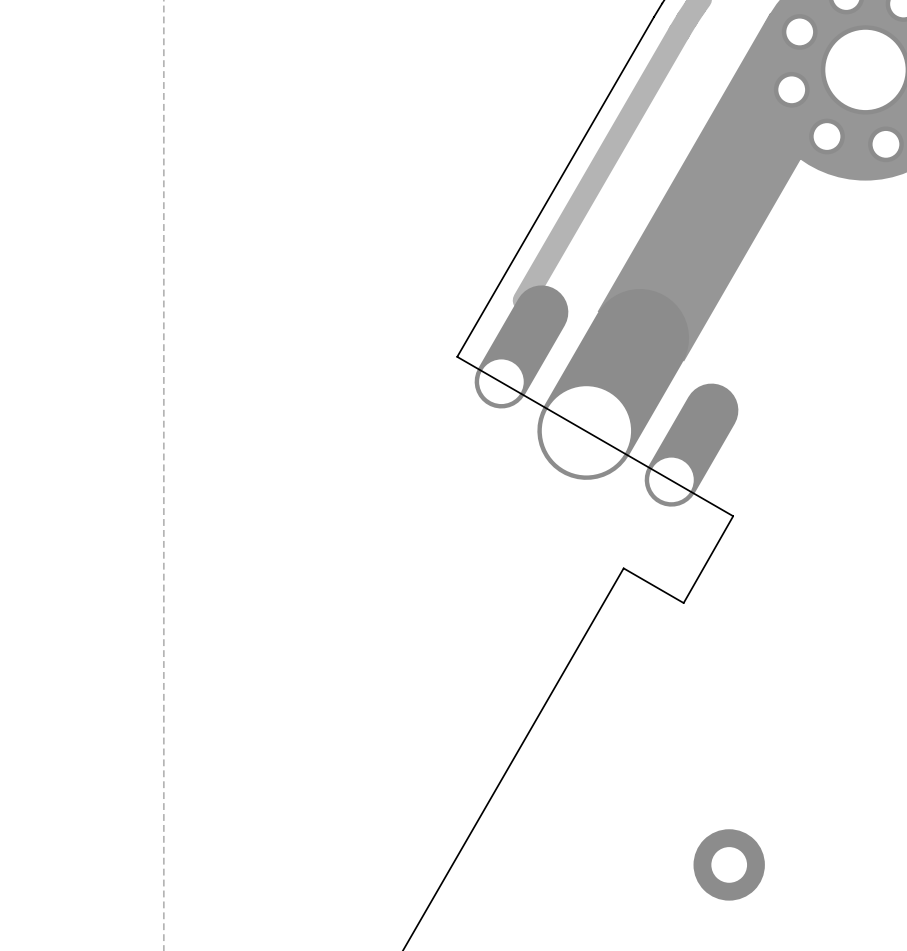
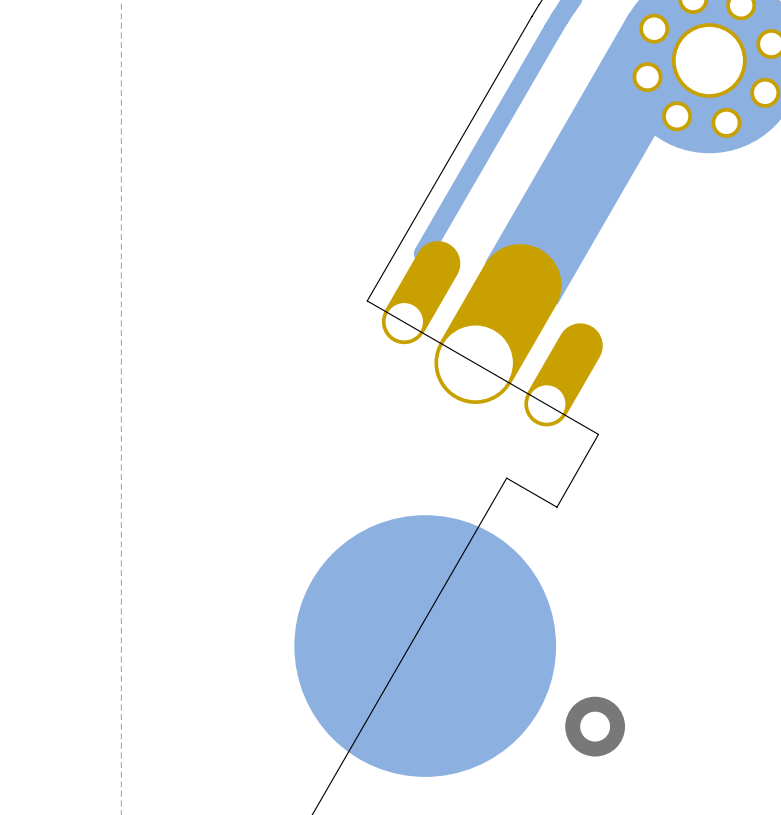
part: none -> (425, 646)

